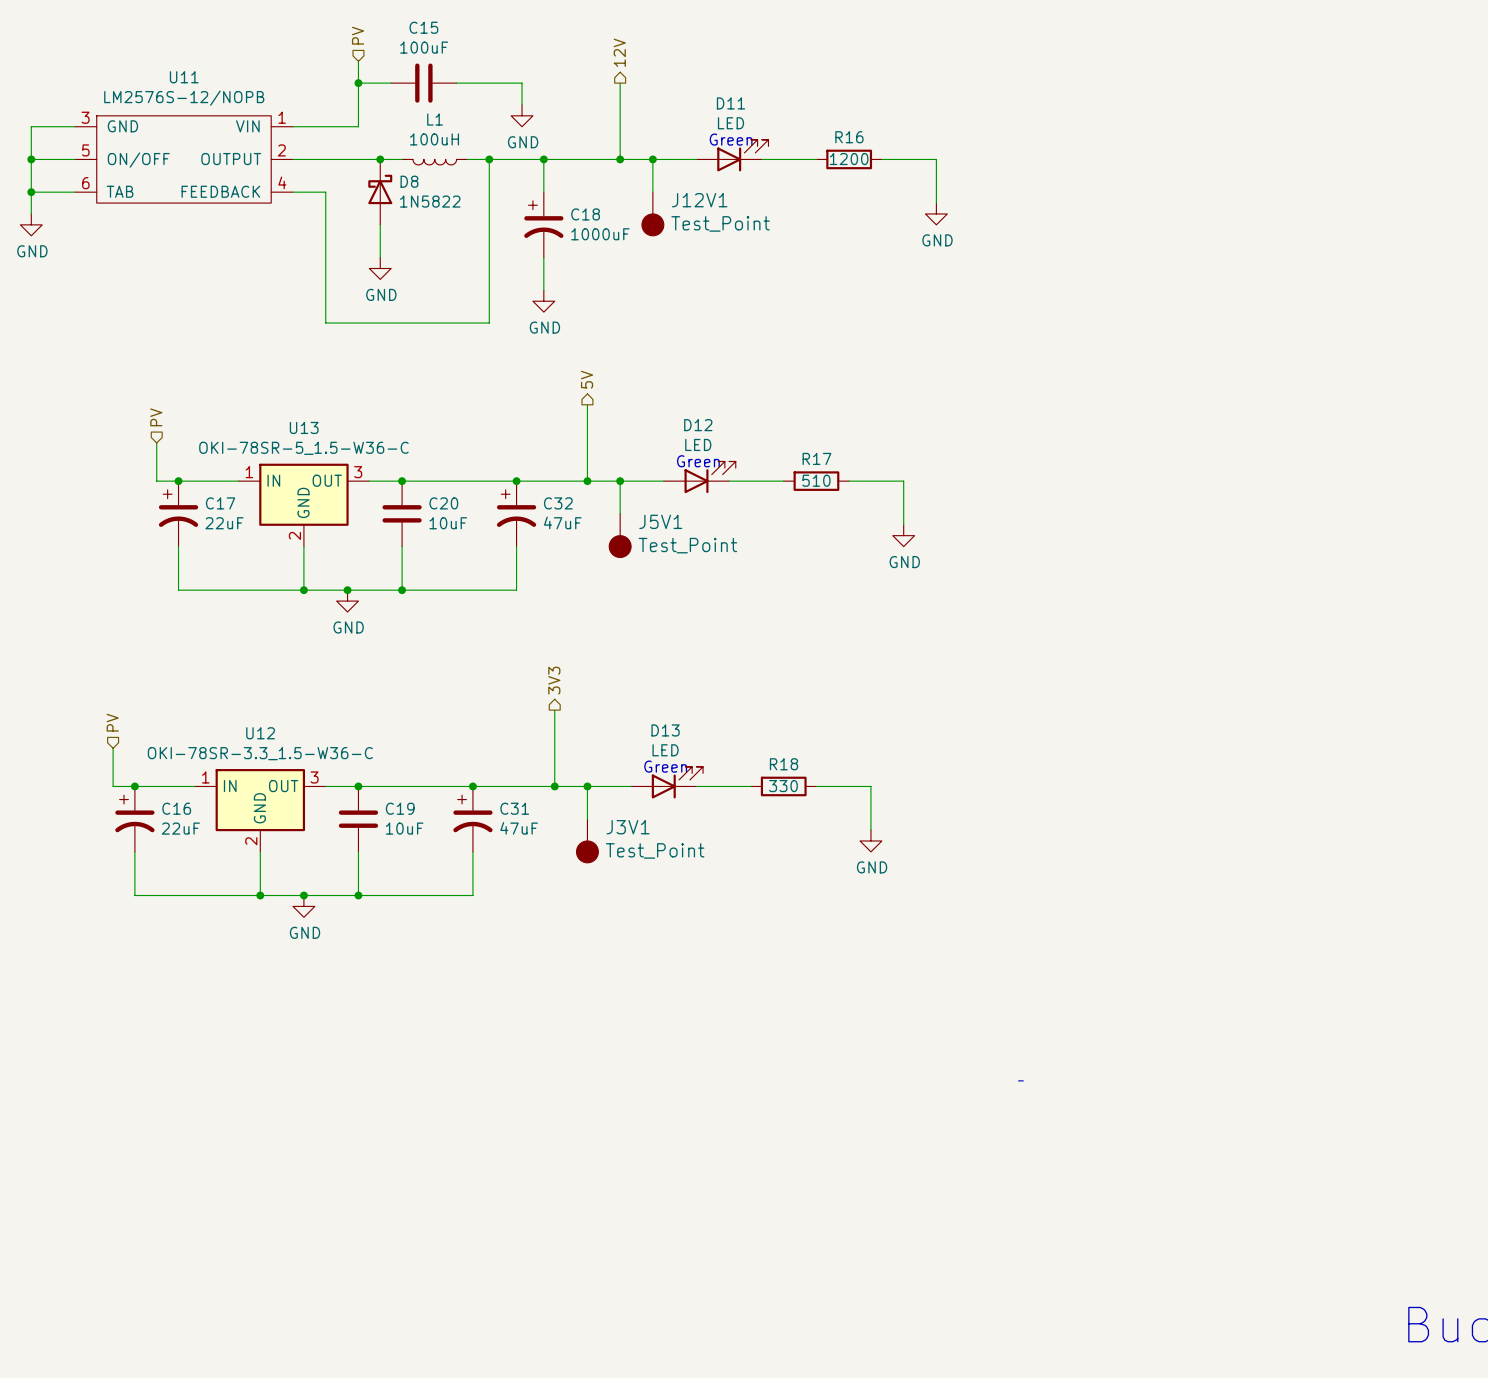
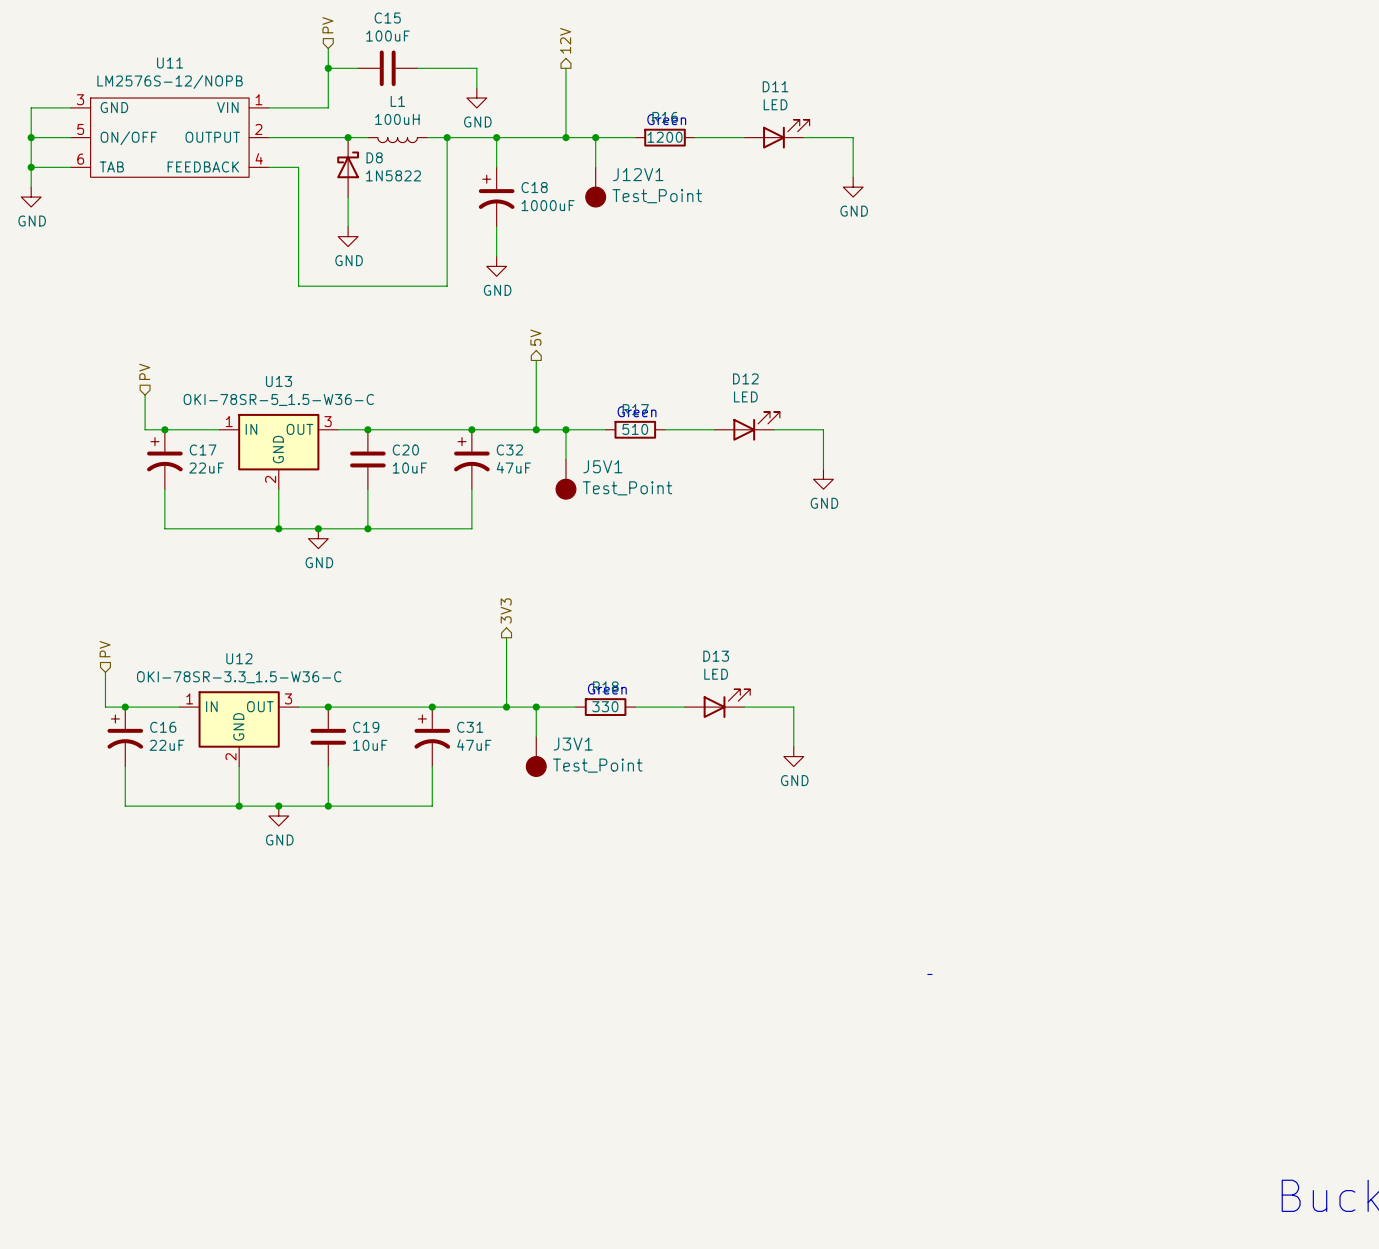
D11 position: (732, 155) -> (776, 134)
R16 position: (849, 159) -> (665, 137)
D12 position: (699, 477) -> (747, 426)
R17 position: (816, 481) -> (635, 429)
D13 position: (667, 782) -> (717, 703)
R18 position: (783, 786) -> (605, 707)

